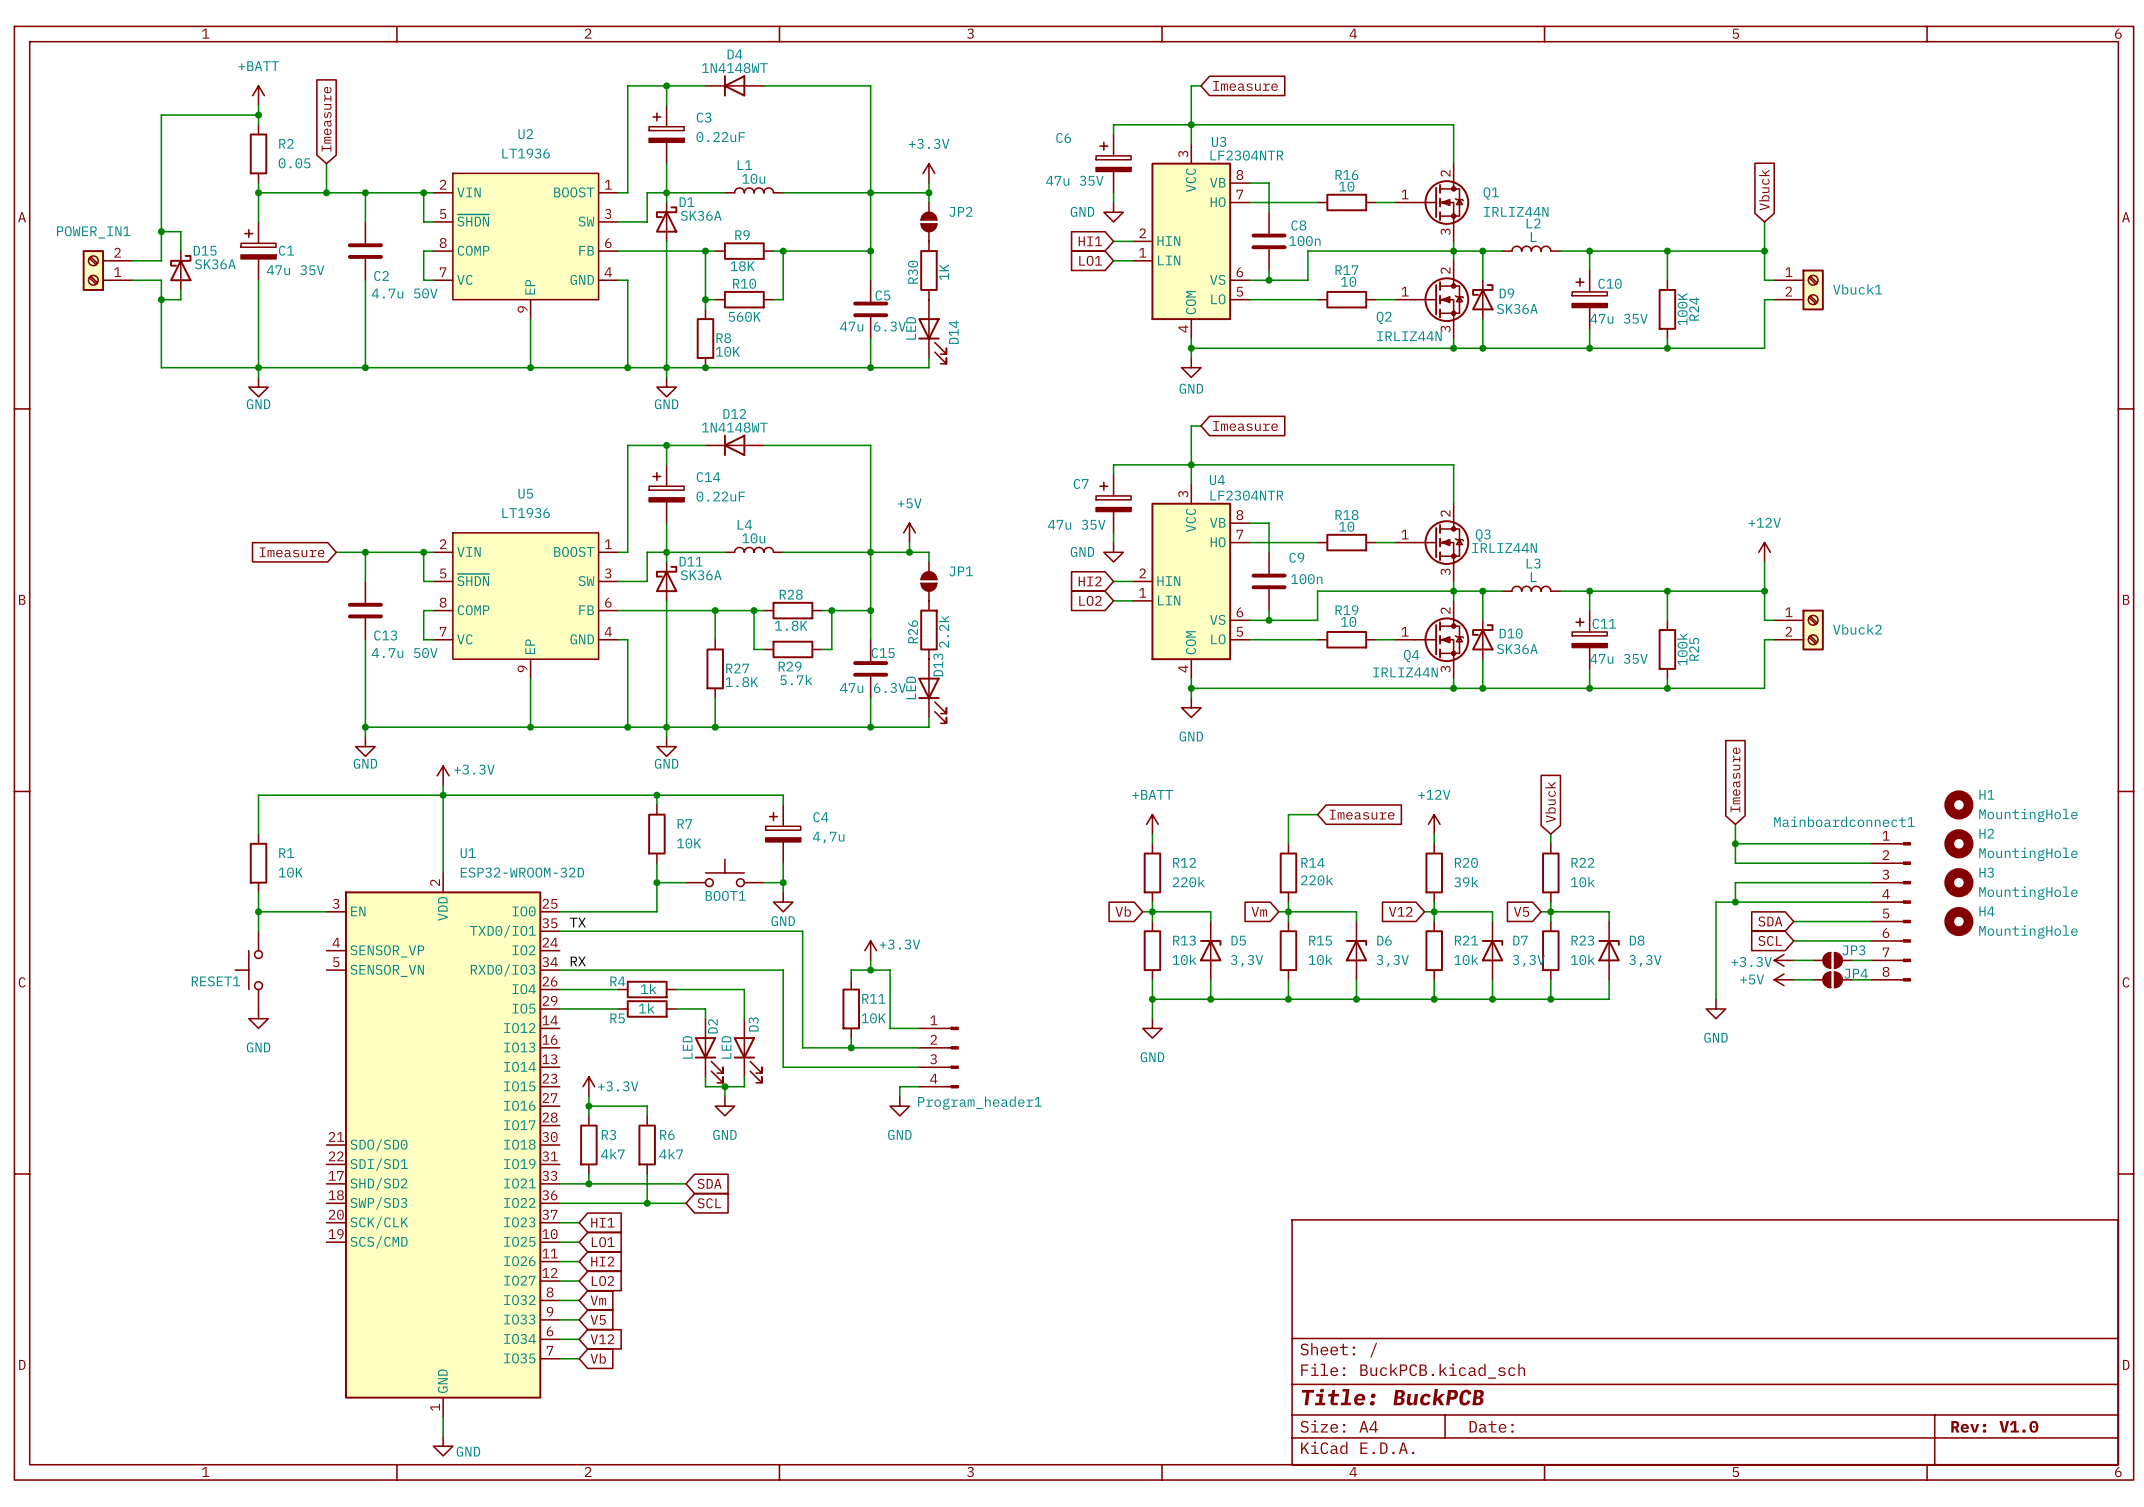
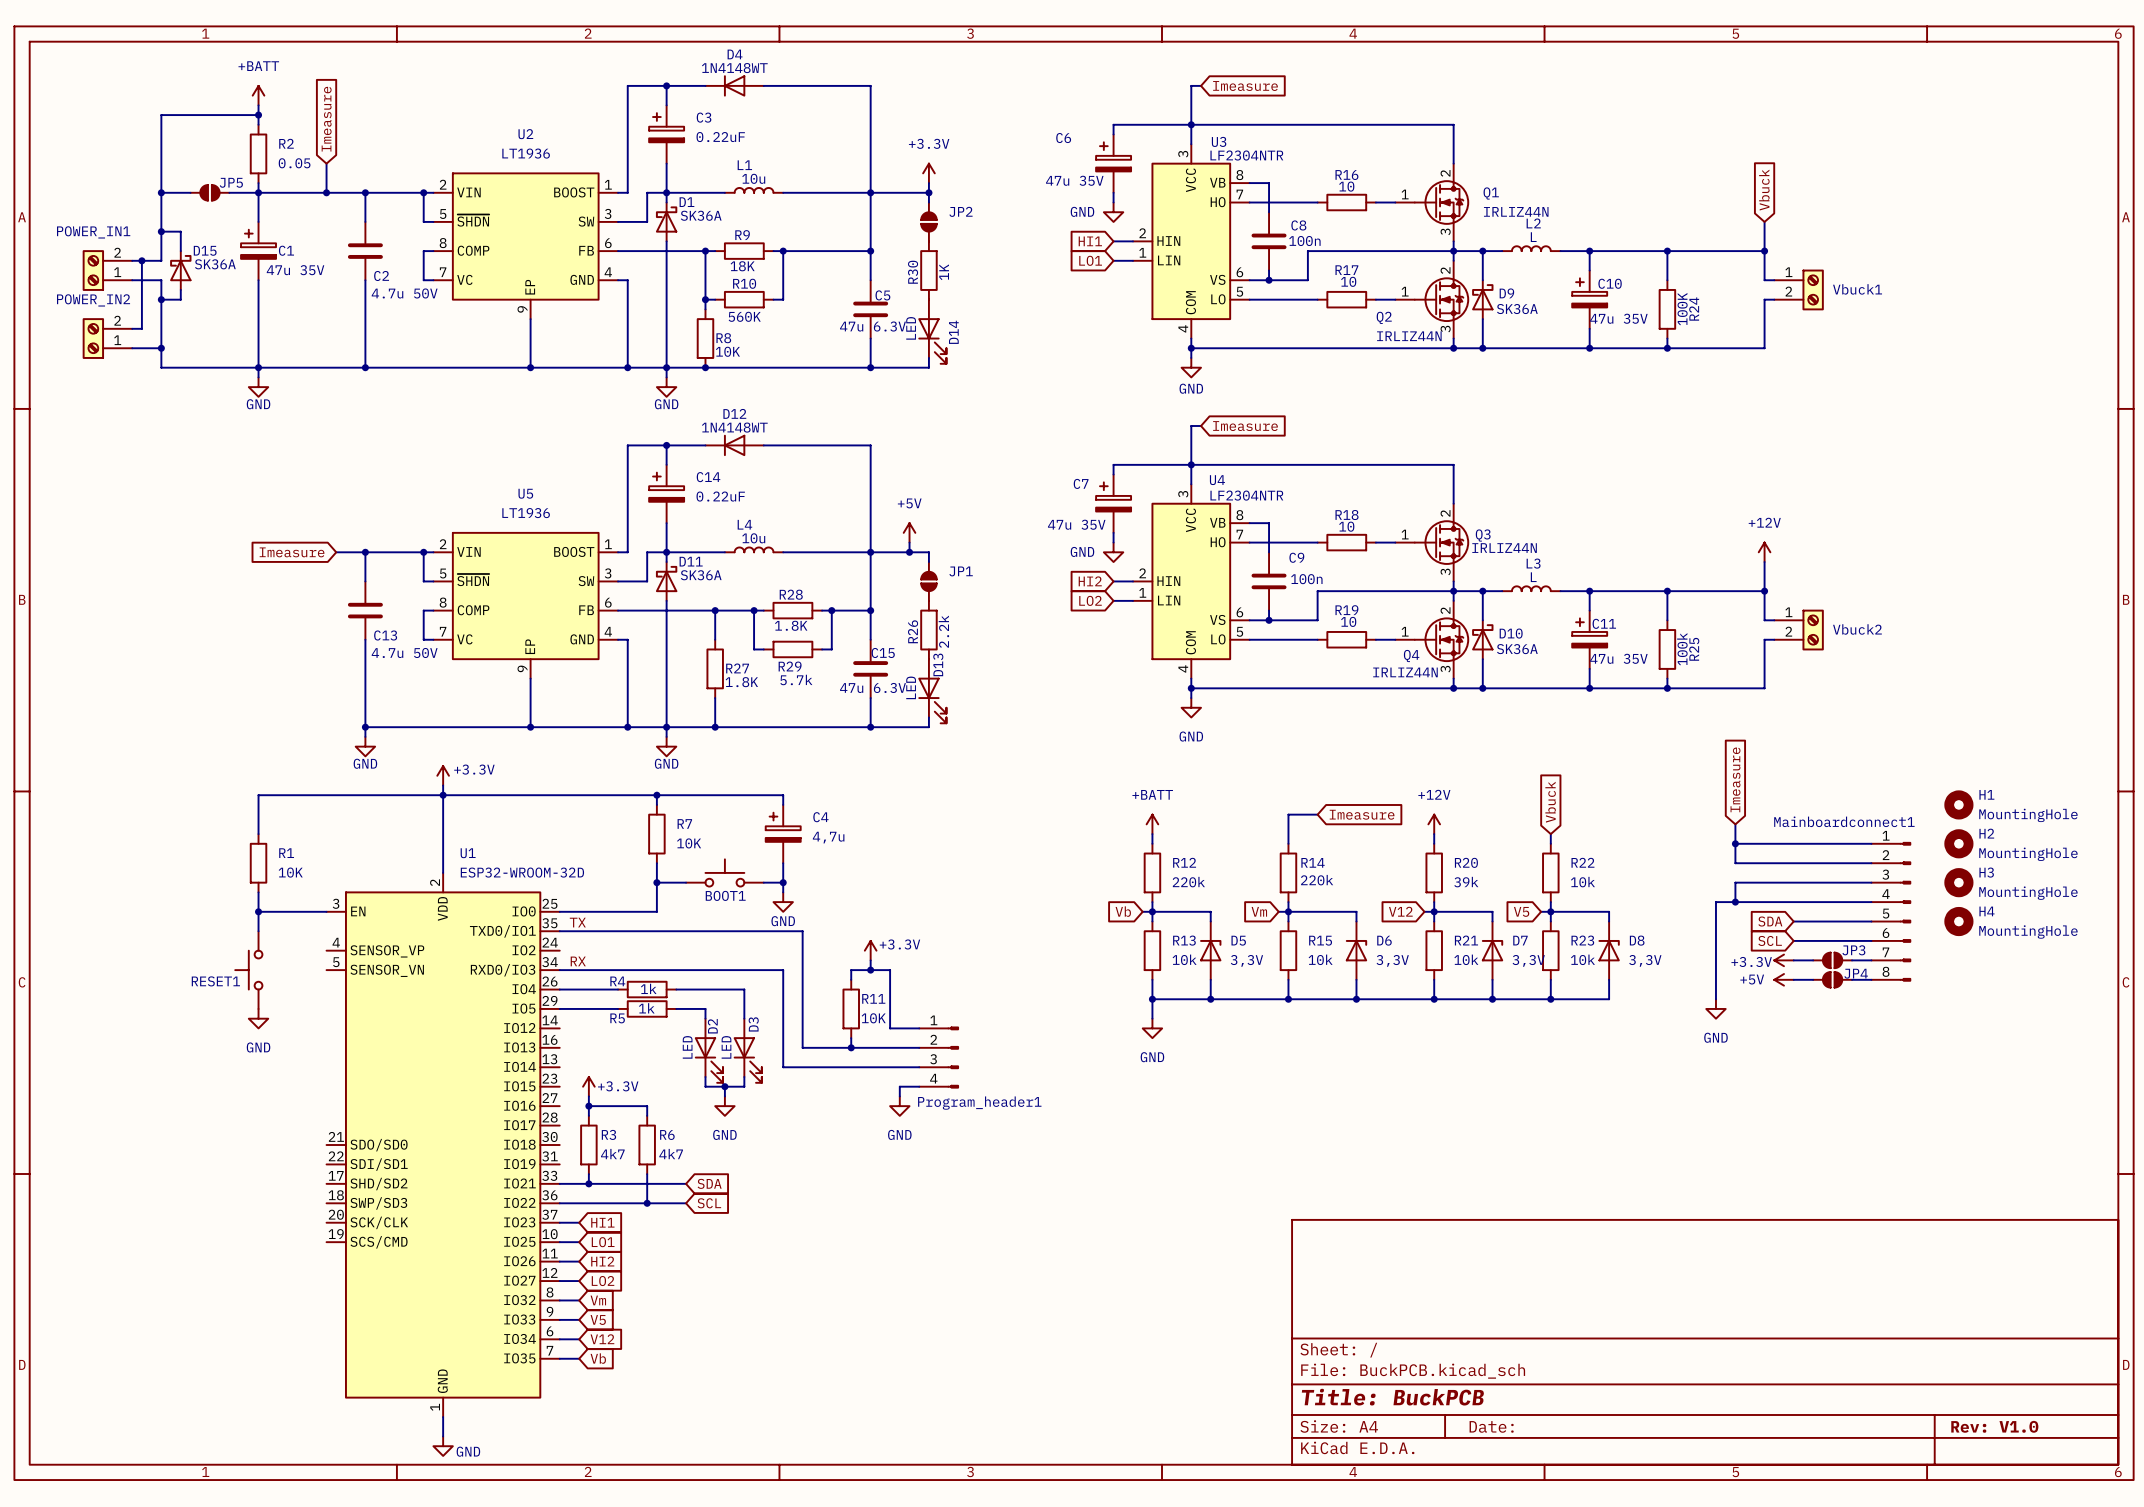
wire: none -> (161, 192) (190, 192)
junction: none -> (161, 192)
JP5: none -> (209, 192)
wire: none -> (229, 192) (258, 192)
wire: none -> (141, 260) (141, 328) (132, 328)
junction: none -> (141, 260)
POWER_IN2: none -> (107, 338)
wire: none -> (132, 348) (161, 348)
junction: none -> (161, 348)

